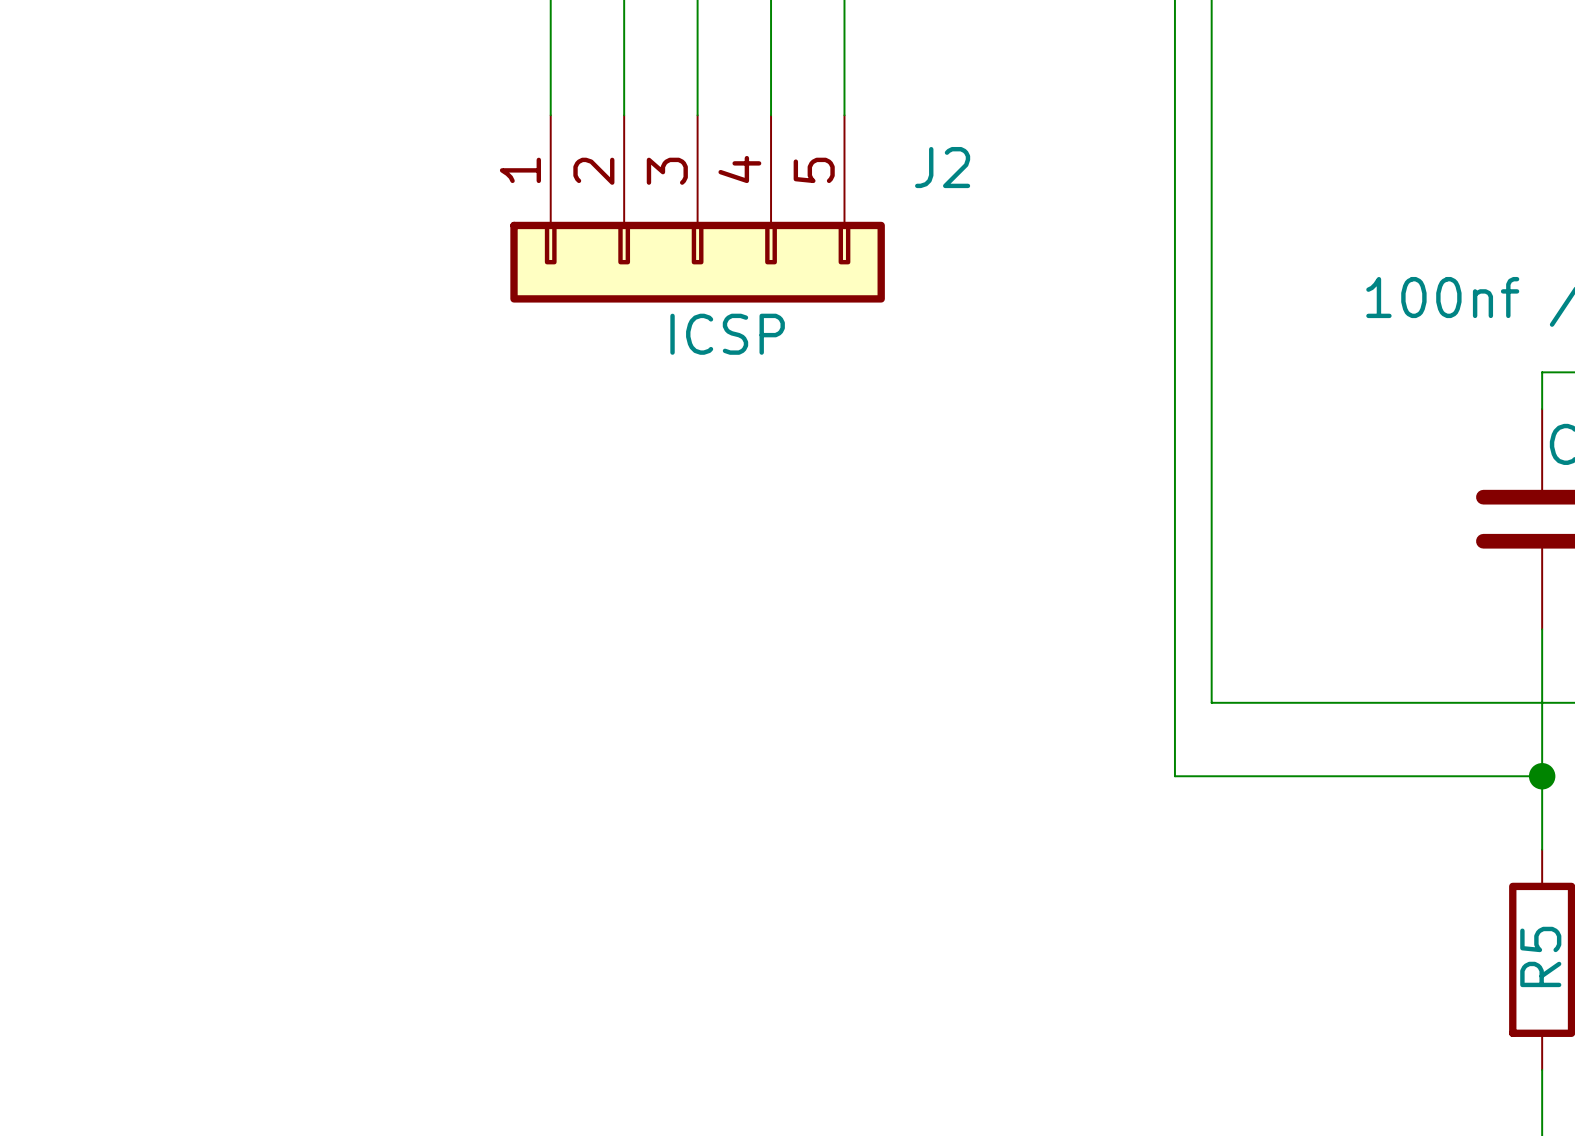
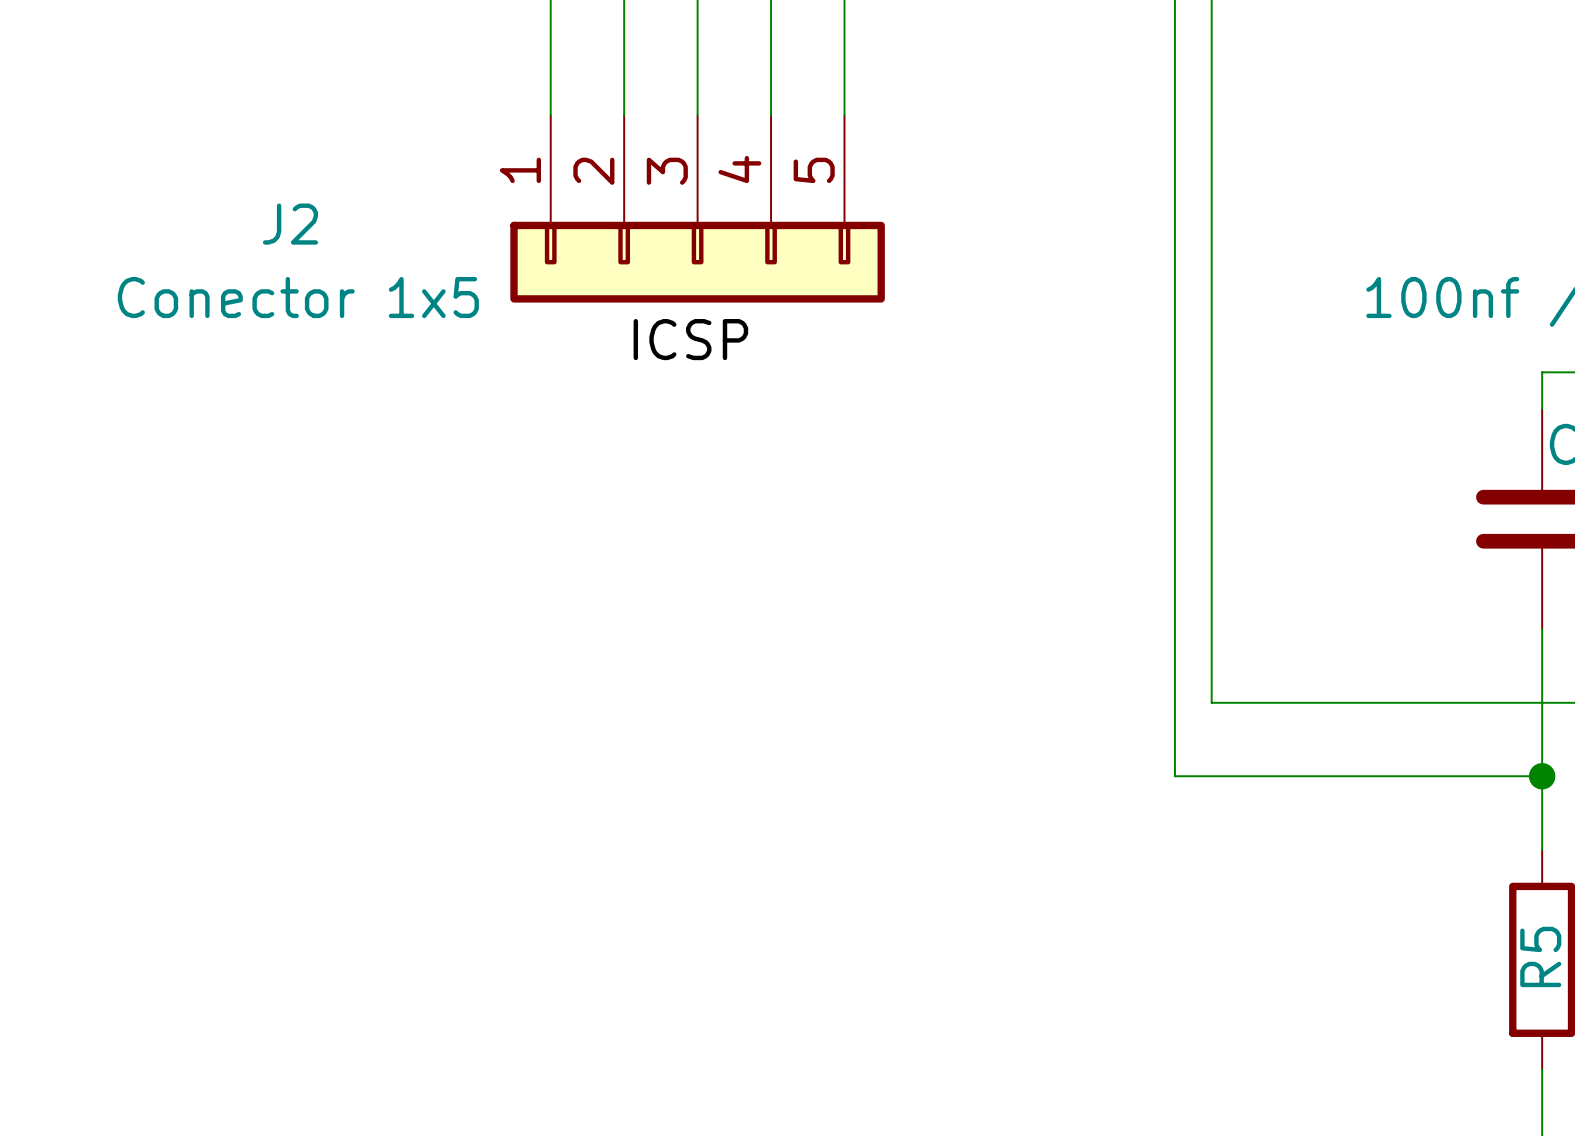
J2 name position: J2 (942, 167) -> J2 (290, 224)
J2 value: ICSP (727, 334) -> Conector 1x5 (298, 297)
label: none -> ICSP (690, 339)

